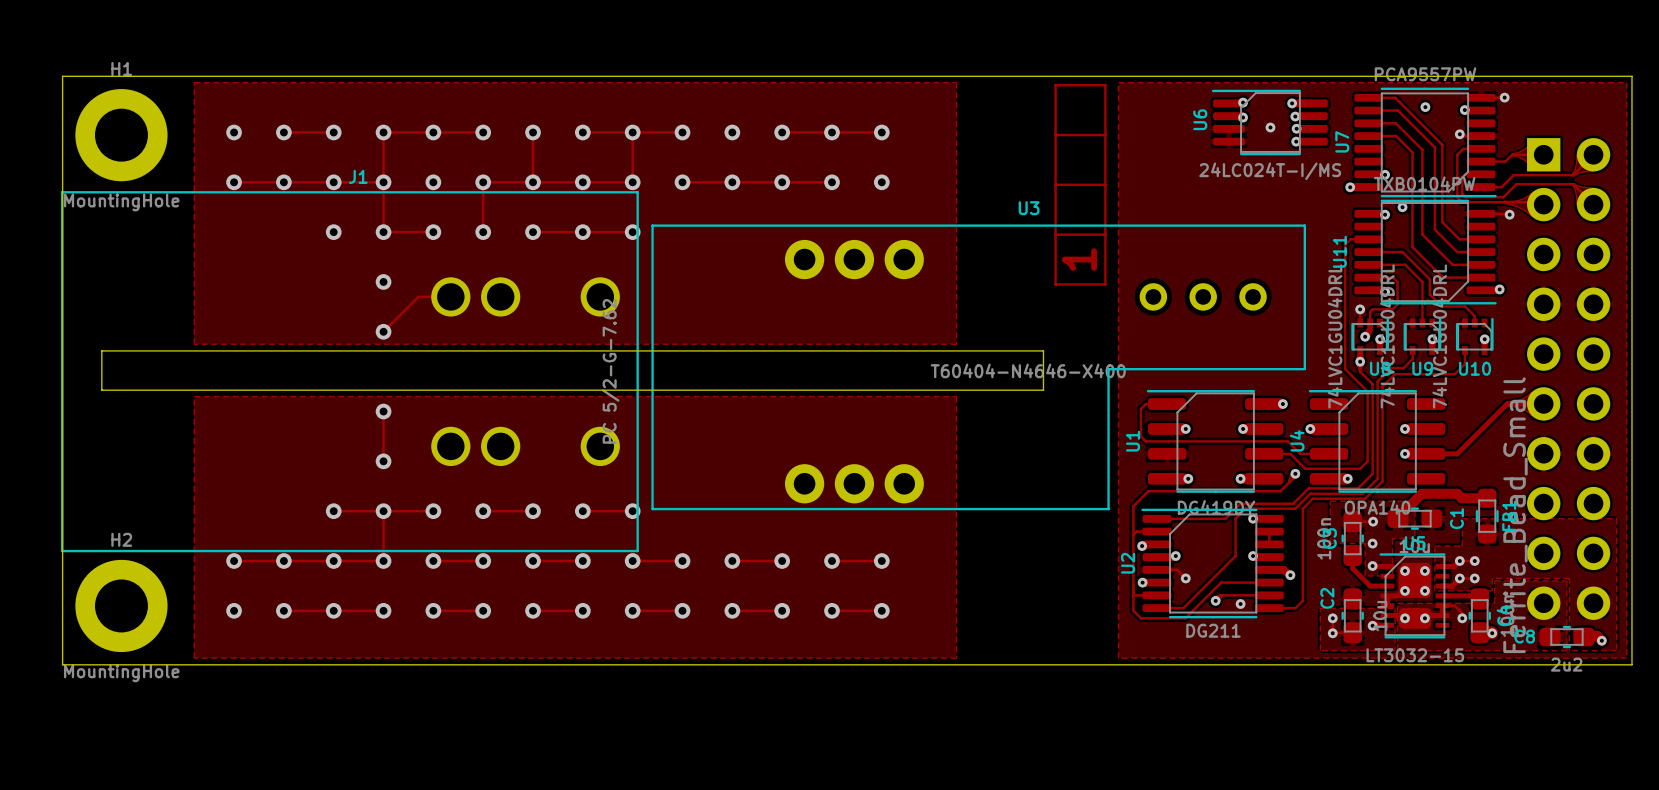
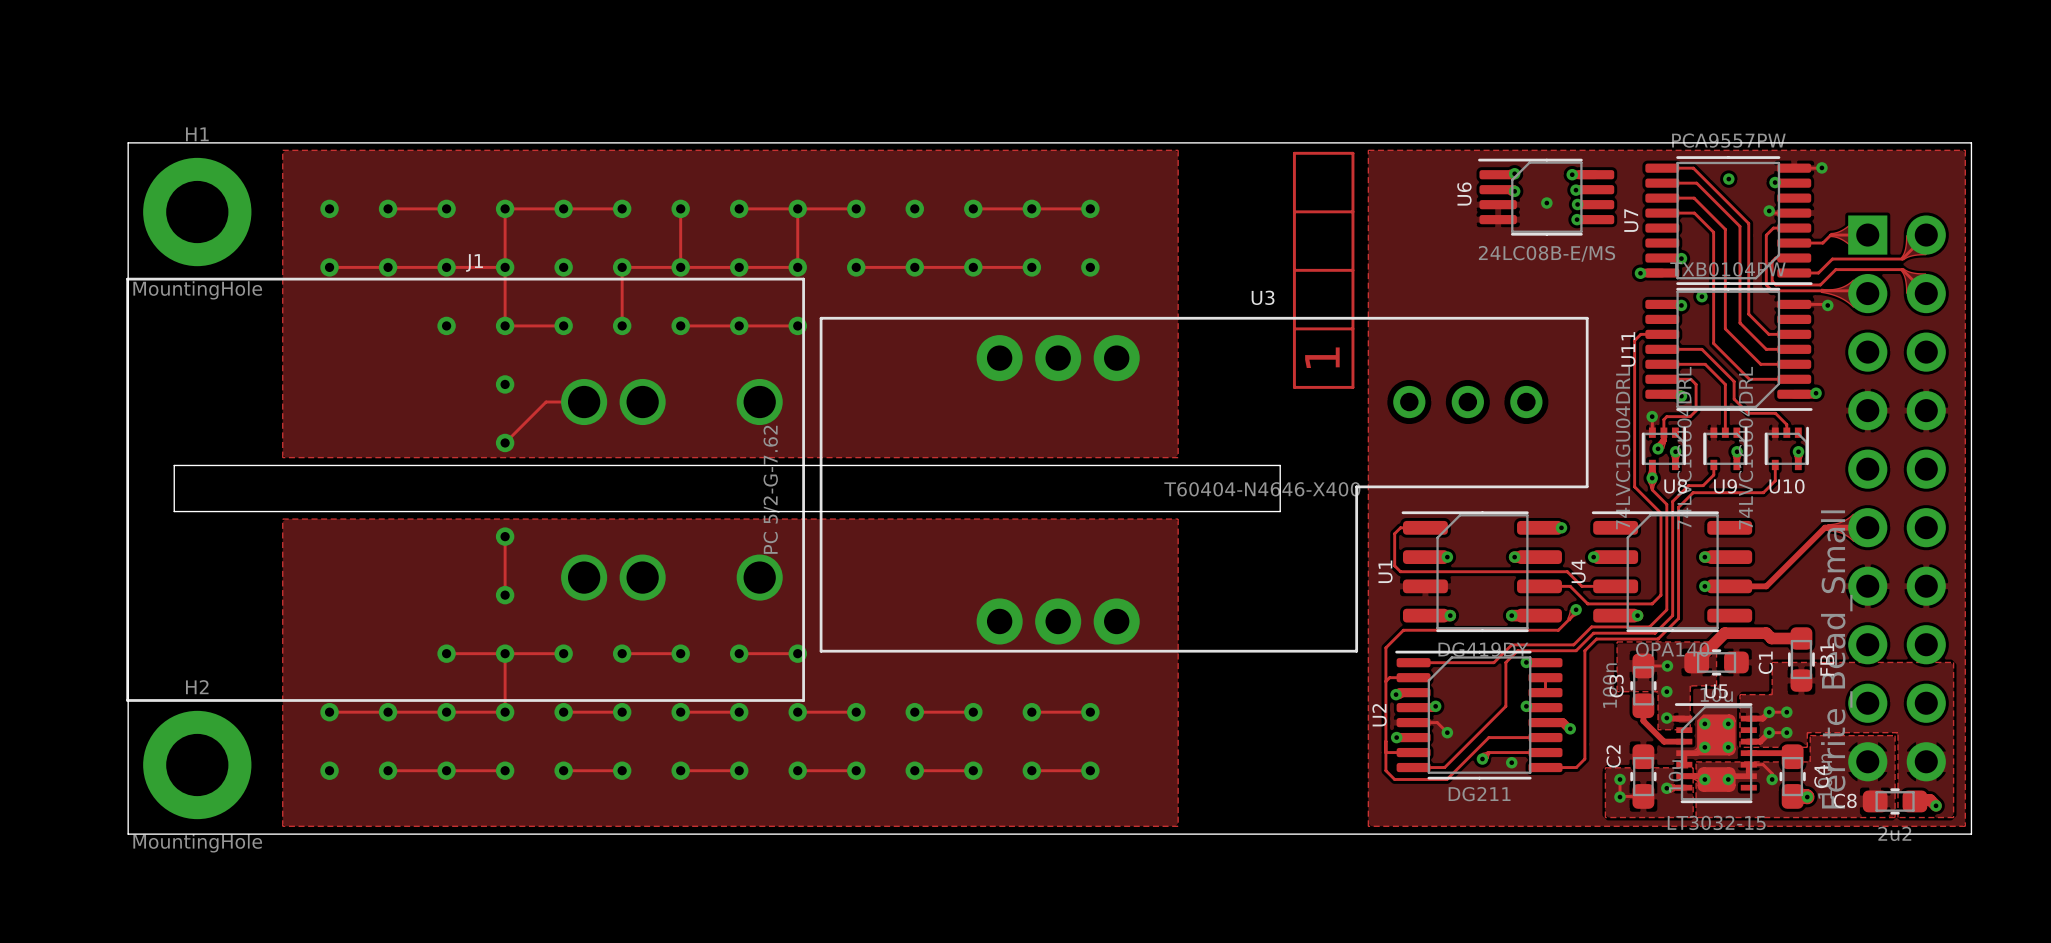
U6 value: 24LC024T-I/MS (1270, 171) -> 24LC08B-E/MS (1547, 253)

